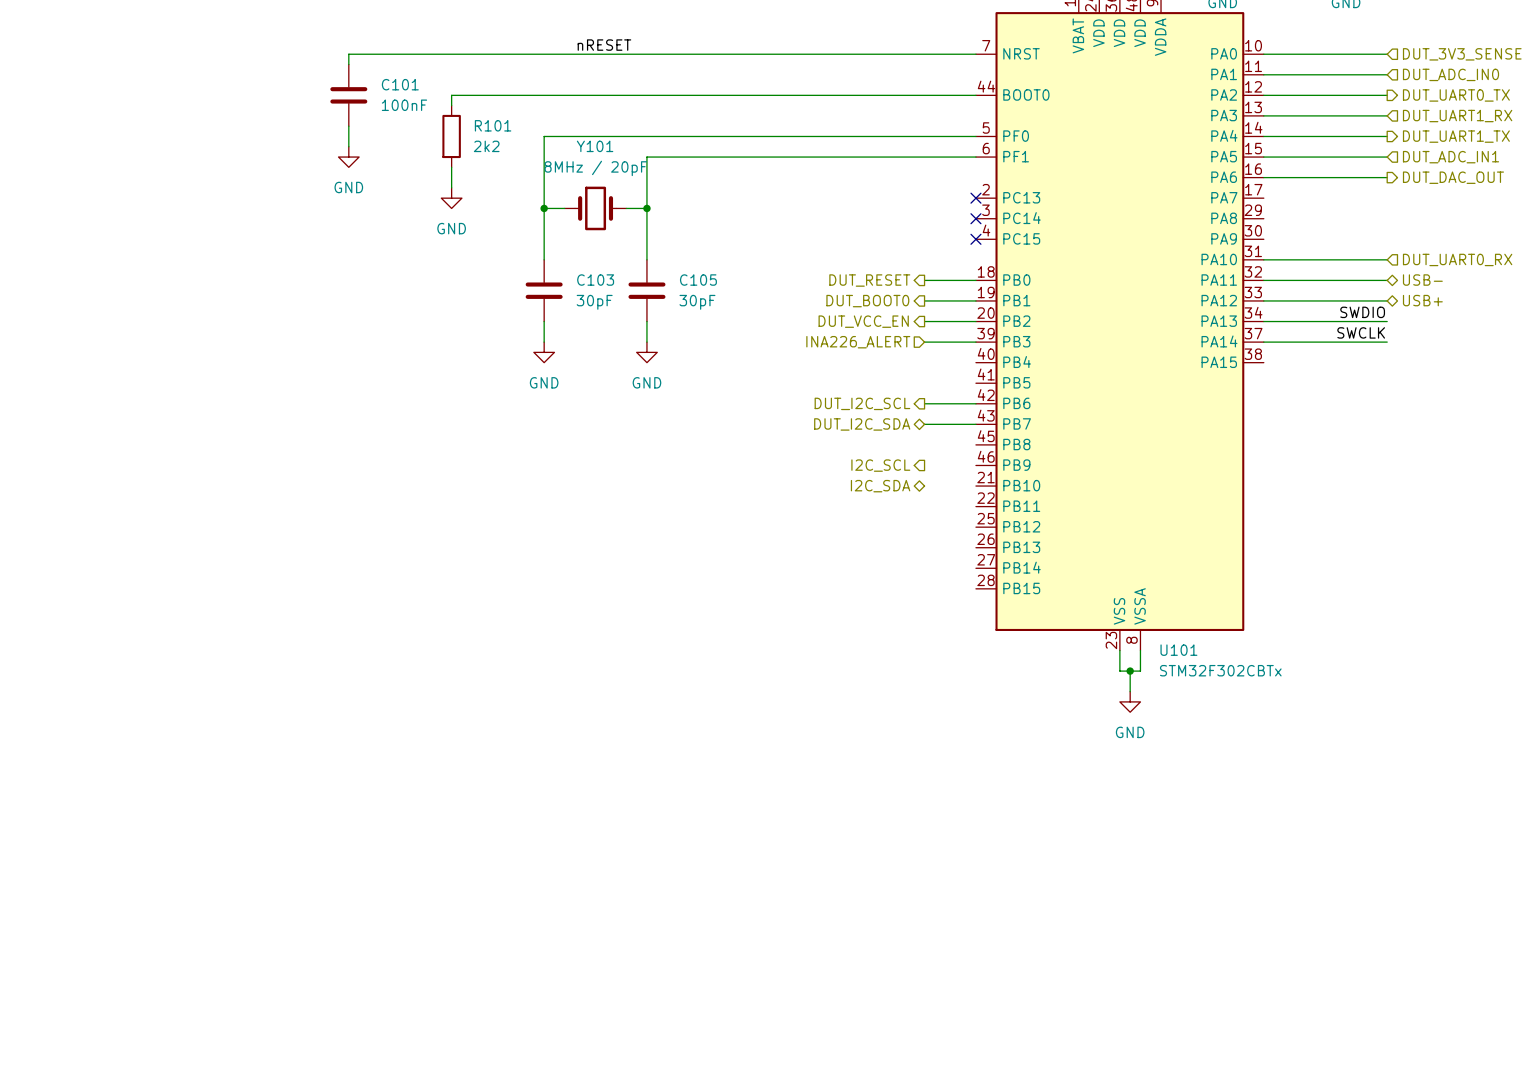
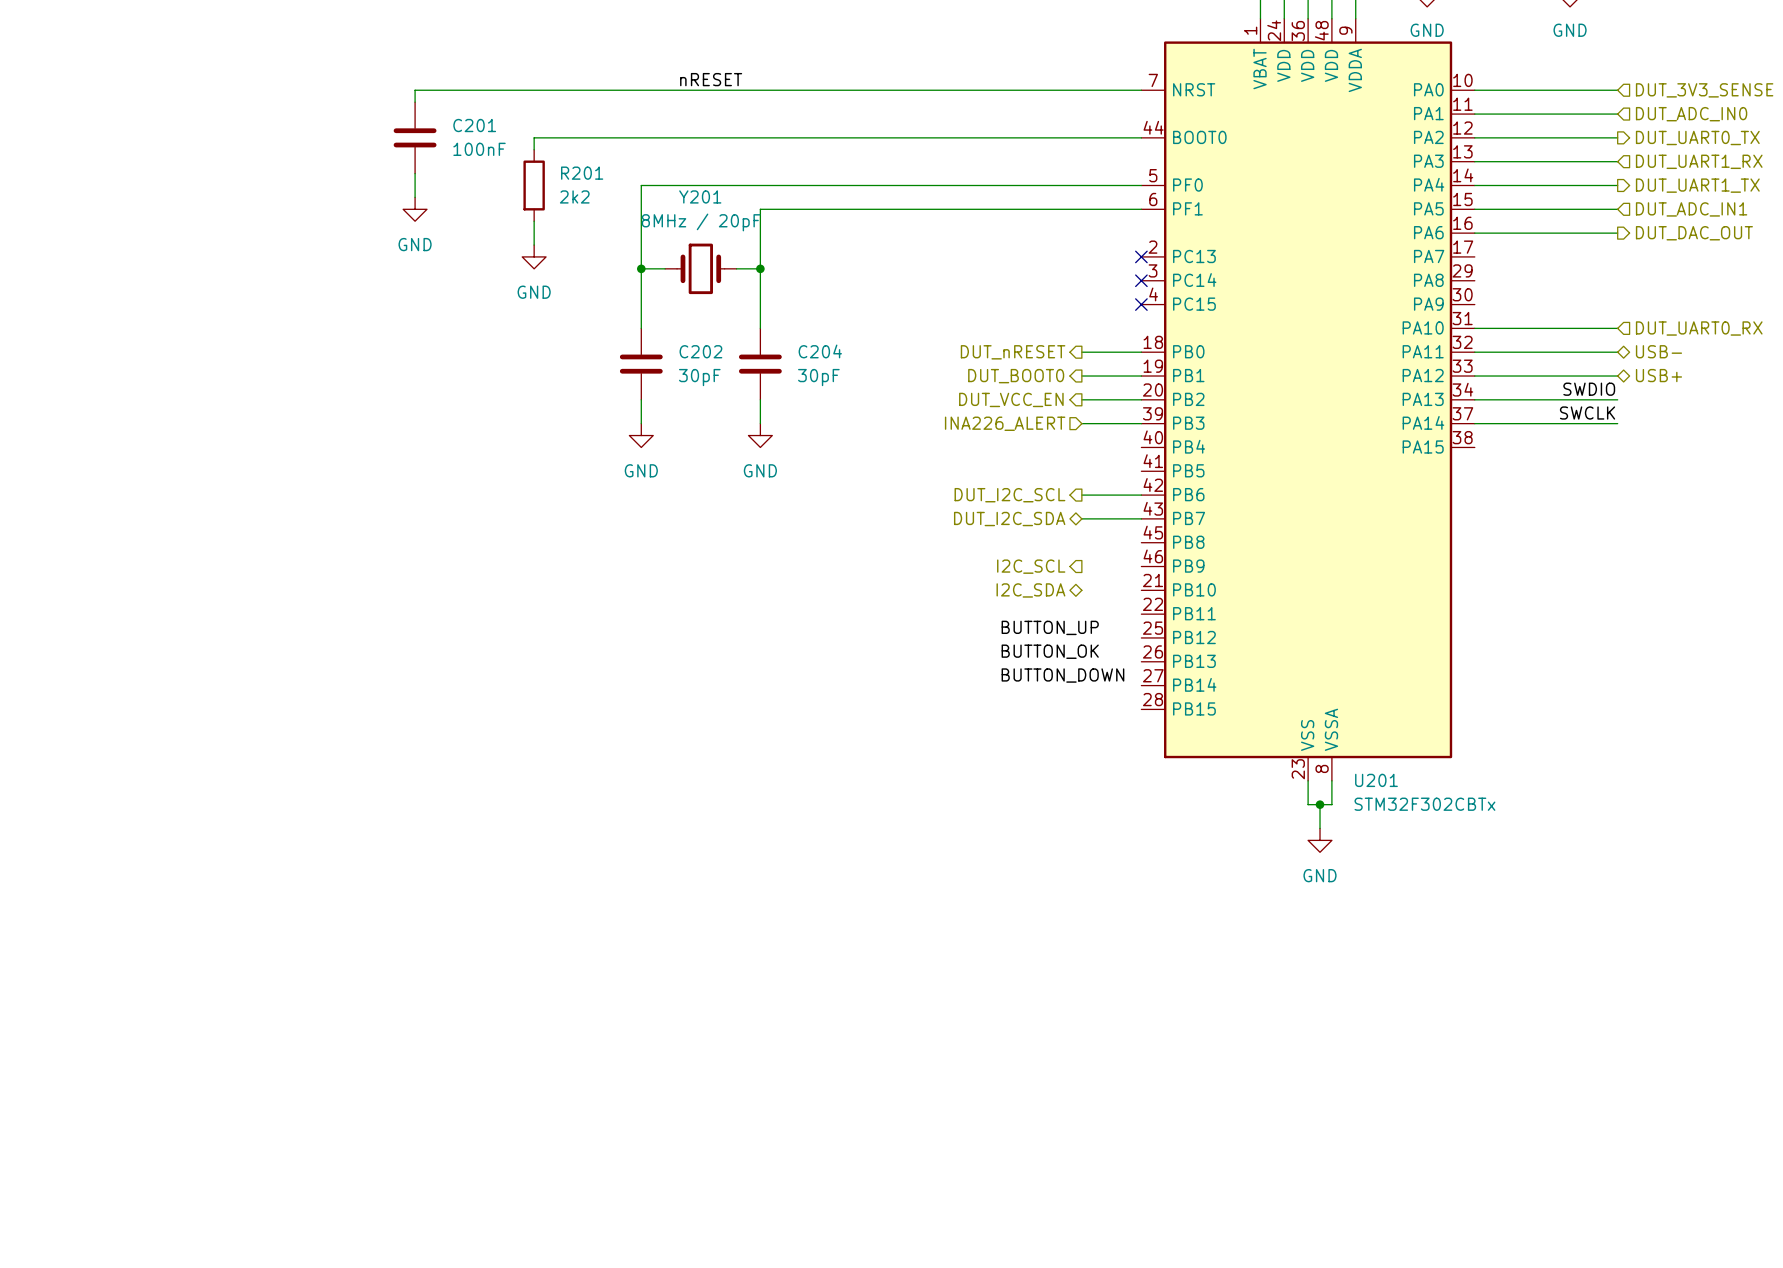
C101 name: C101 (400, 84) -> C201 (474, 125)
R101 name: R101 (493, 125) -> R201 (582, 173)
Y101 name: Y101 (595, 146) -> Y201 (700, 196)
C103 name: C103 (595, 280) -> C202 (700, 351)
C105 name: C105 (698, 280) -> C204 (820, 351)
hierarchical label: DUT_RESET (869, 280) -> DUT_nRESET (1013, 352)
label: none -> BUTTON_UP (1050, 627)
label: none -> BUTTON_OK (1050, 651)
label: none -> BUTTON_DOWN (1062, 675)
U101 name: U101 (1178, 650) -> U201 (1376, 780)

